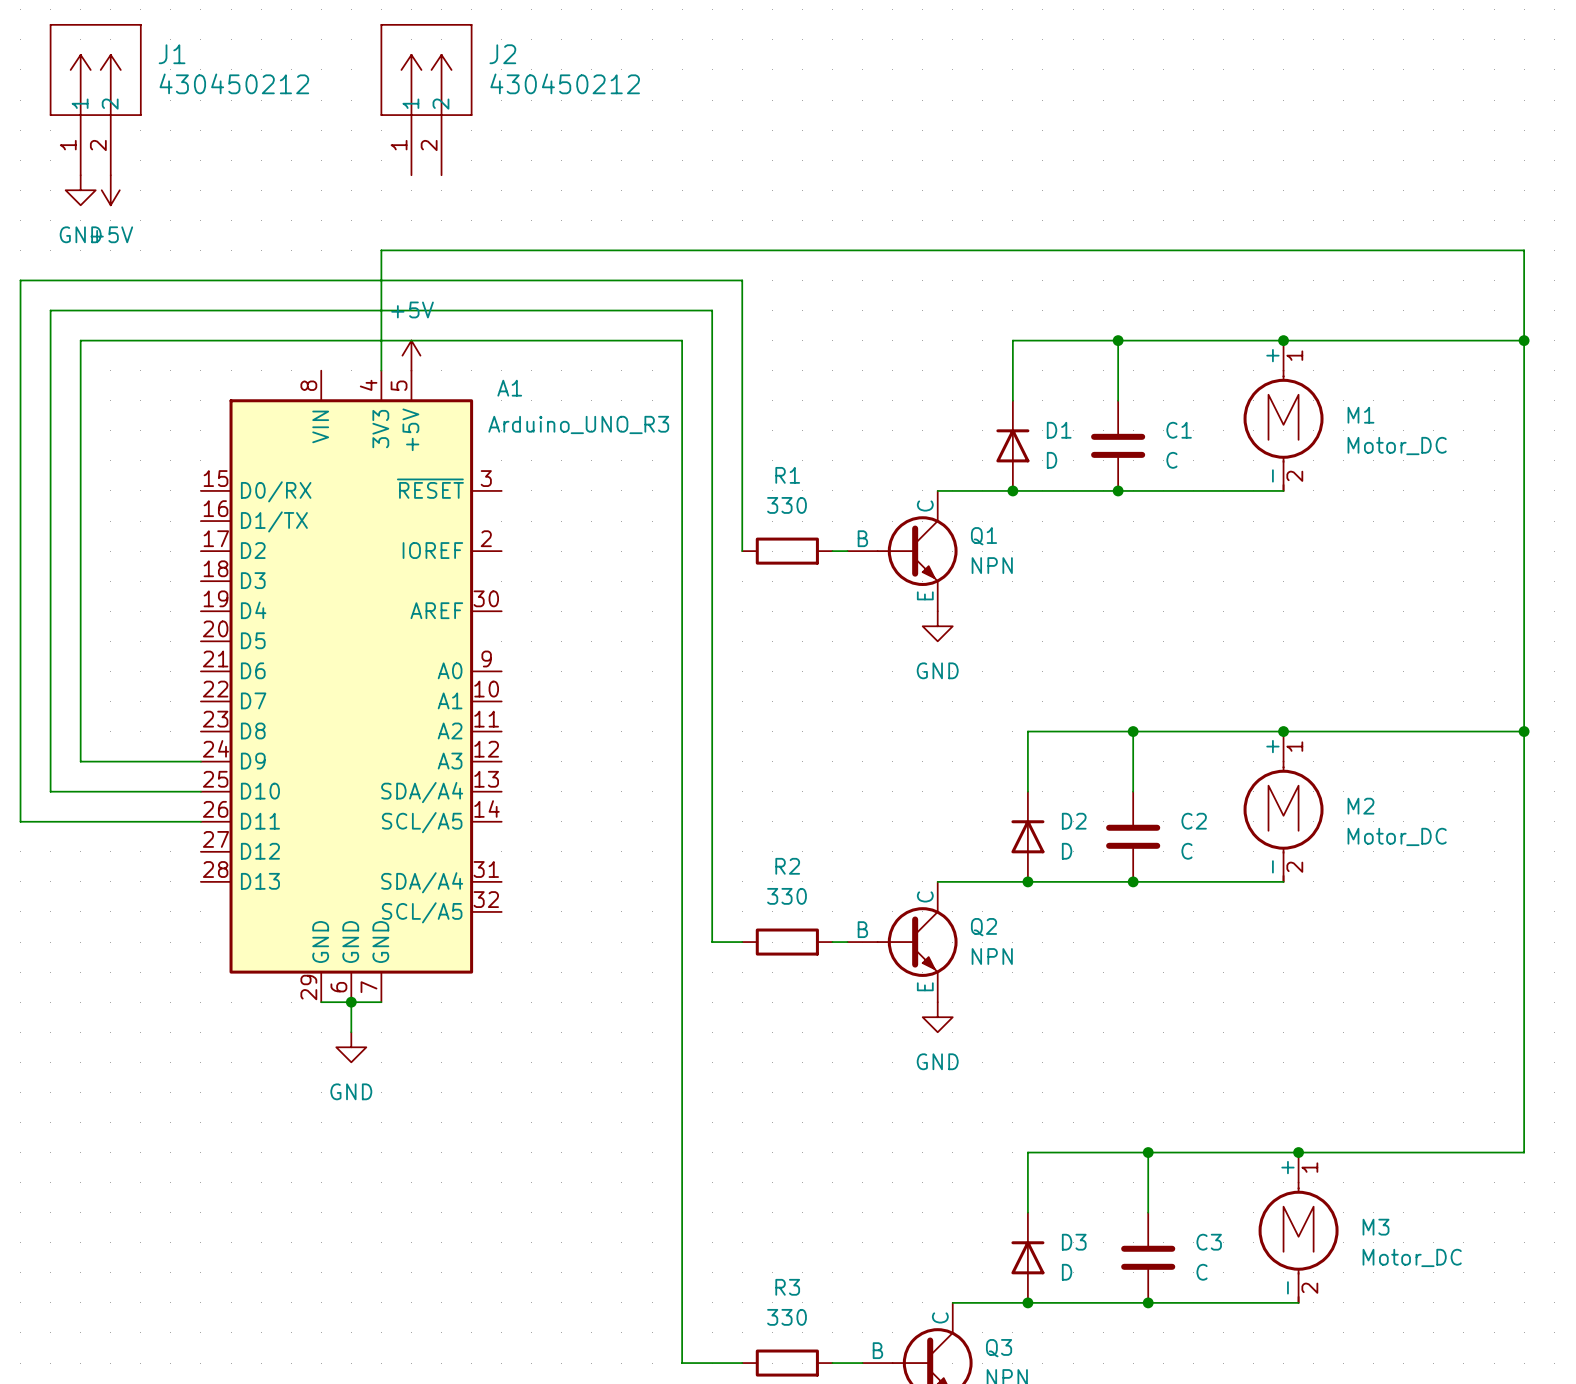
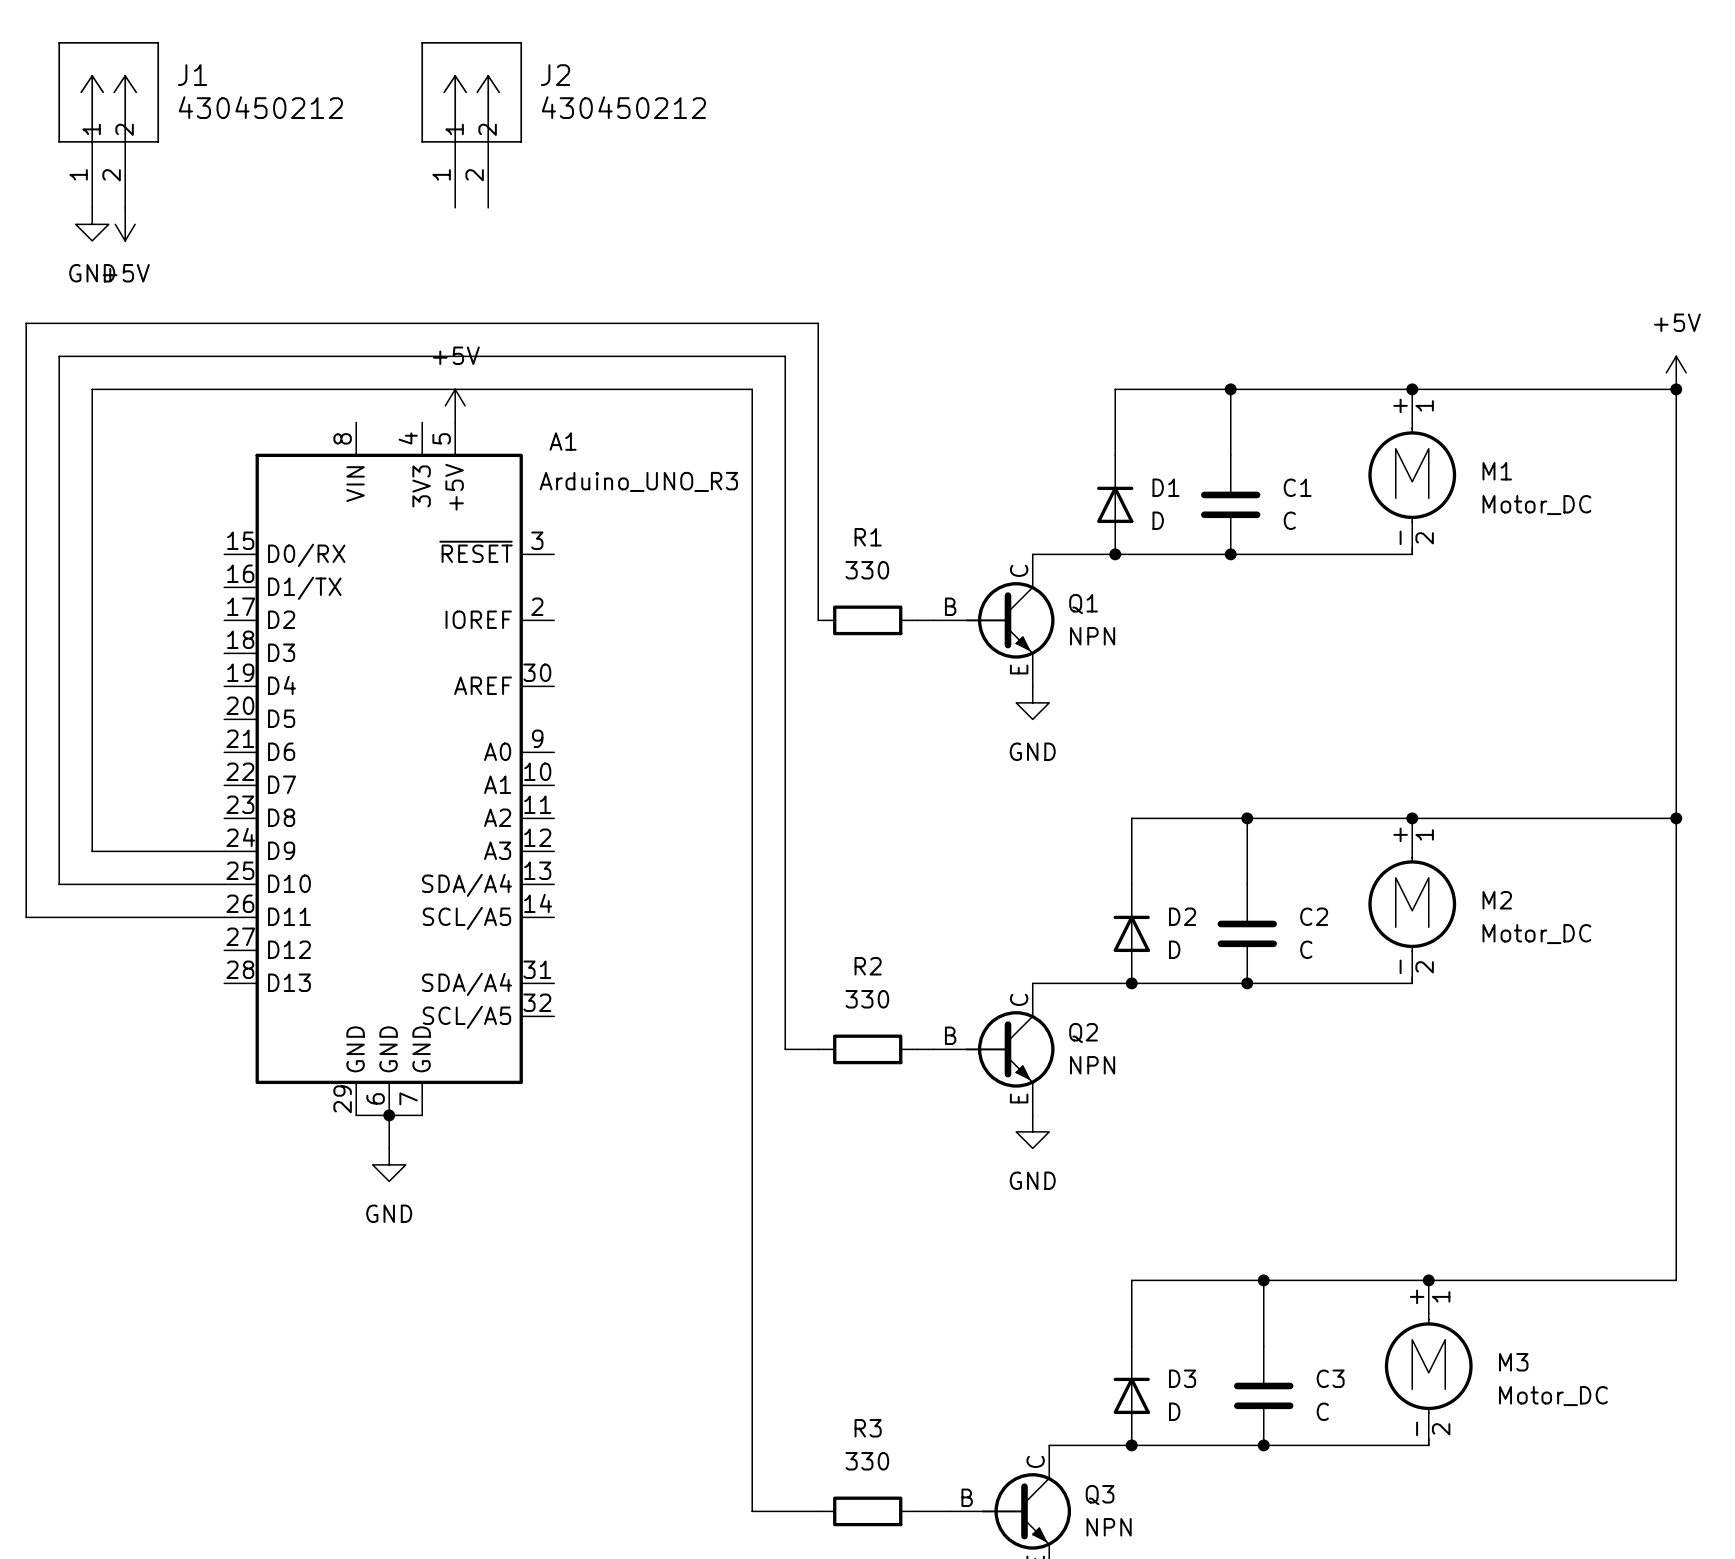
power symbol: none -> +5V (1676, 372)
wire: (1524, 340) (1524, 250) (381, 250) (381, 370) -> none

